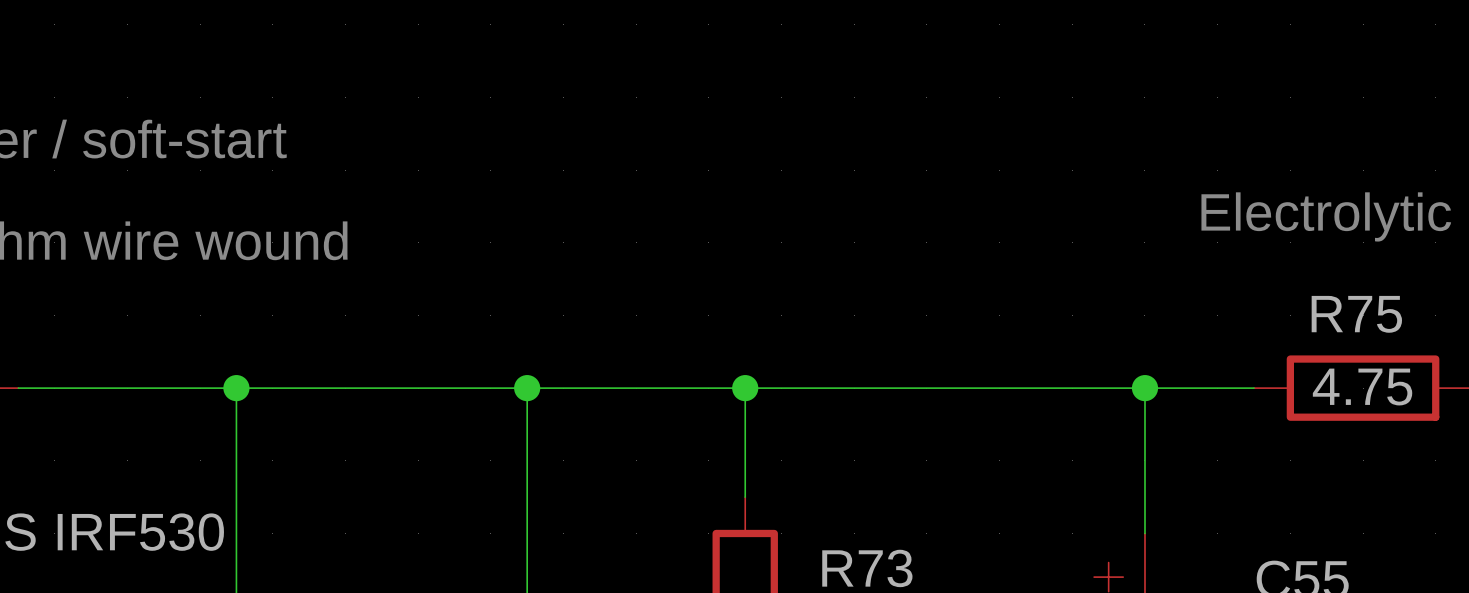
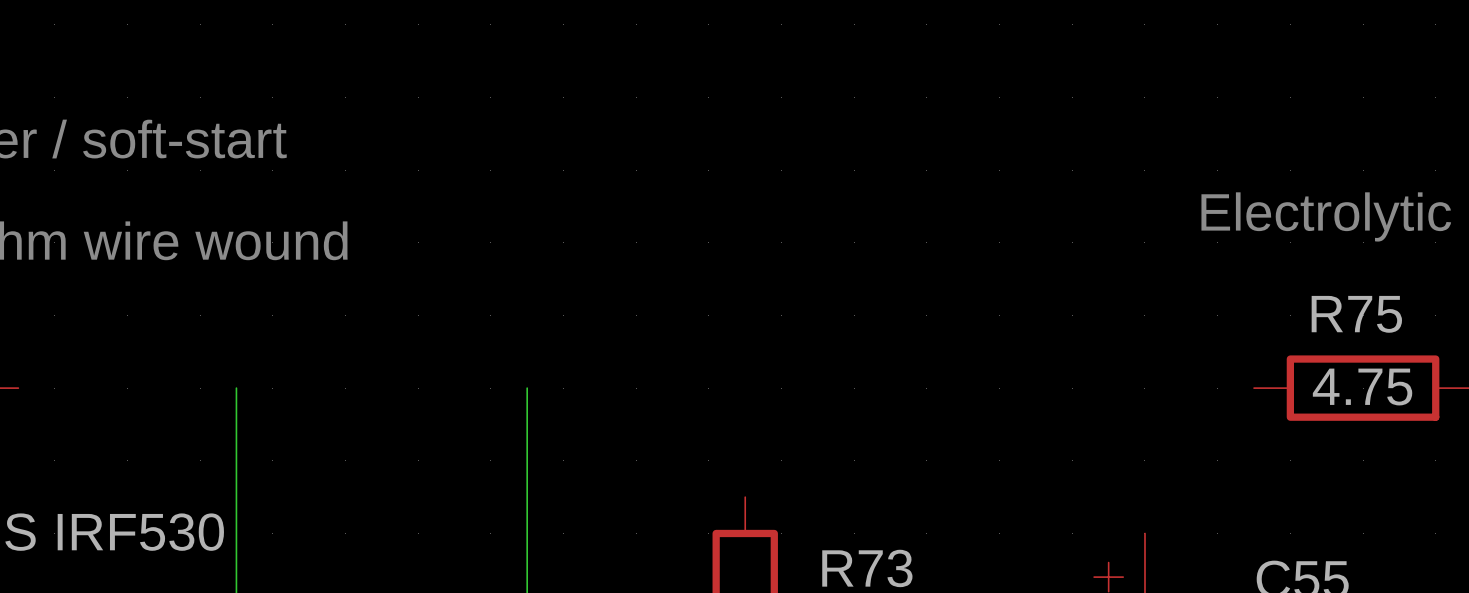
wire: (18, 388) (1254, 388) -> none
junction: (236, 388) -> none
junction: (527, 388) -> none
wire: (745, 388) (745, 497) -> none
junction: (745, 388) -> none
wire: (1144, 388) (1144, 533) -> none
junction: (1144, 388) -> none

